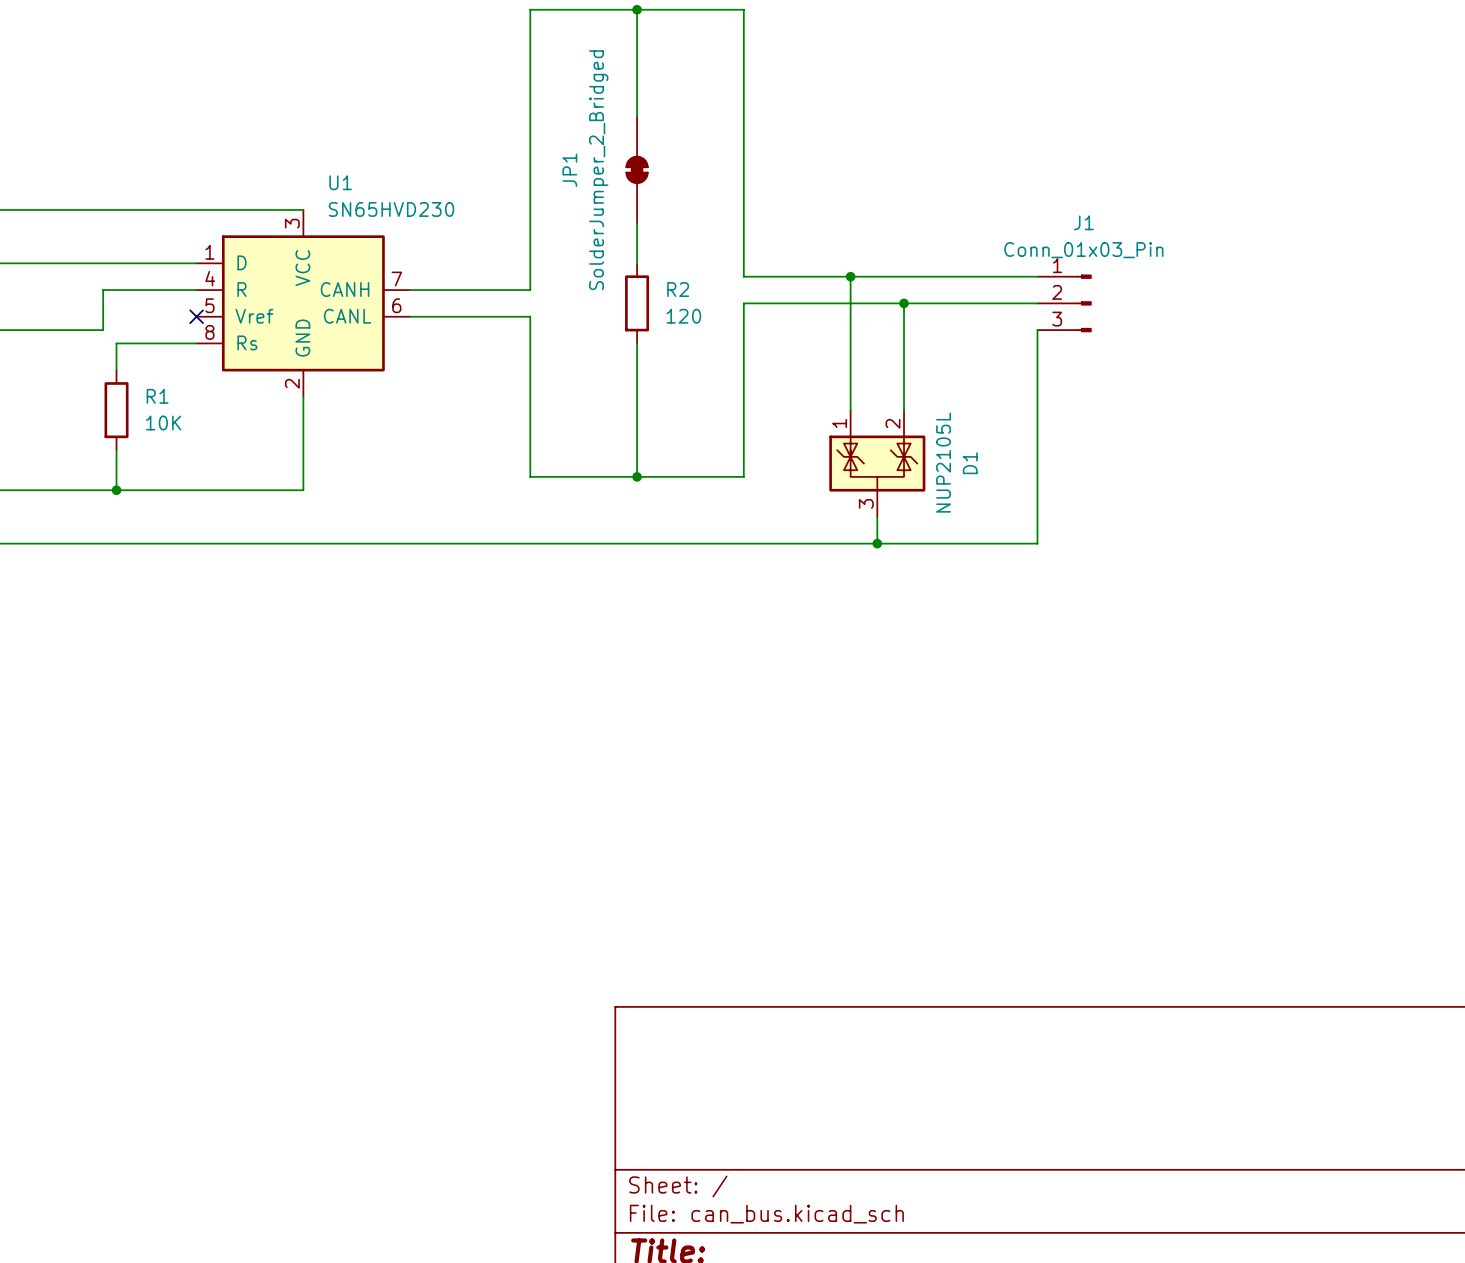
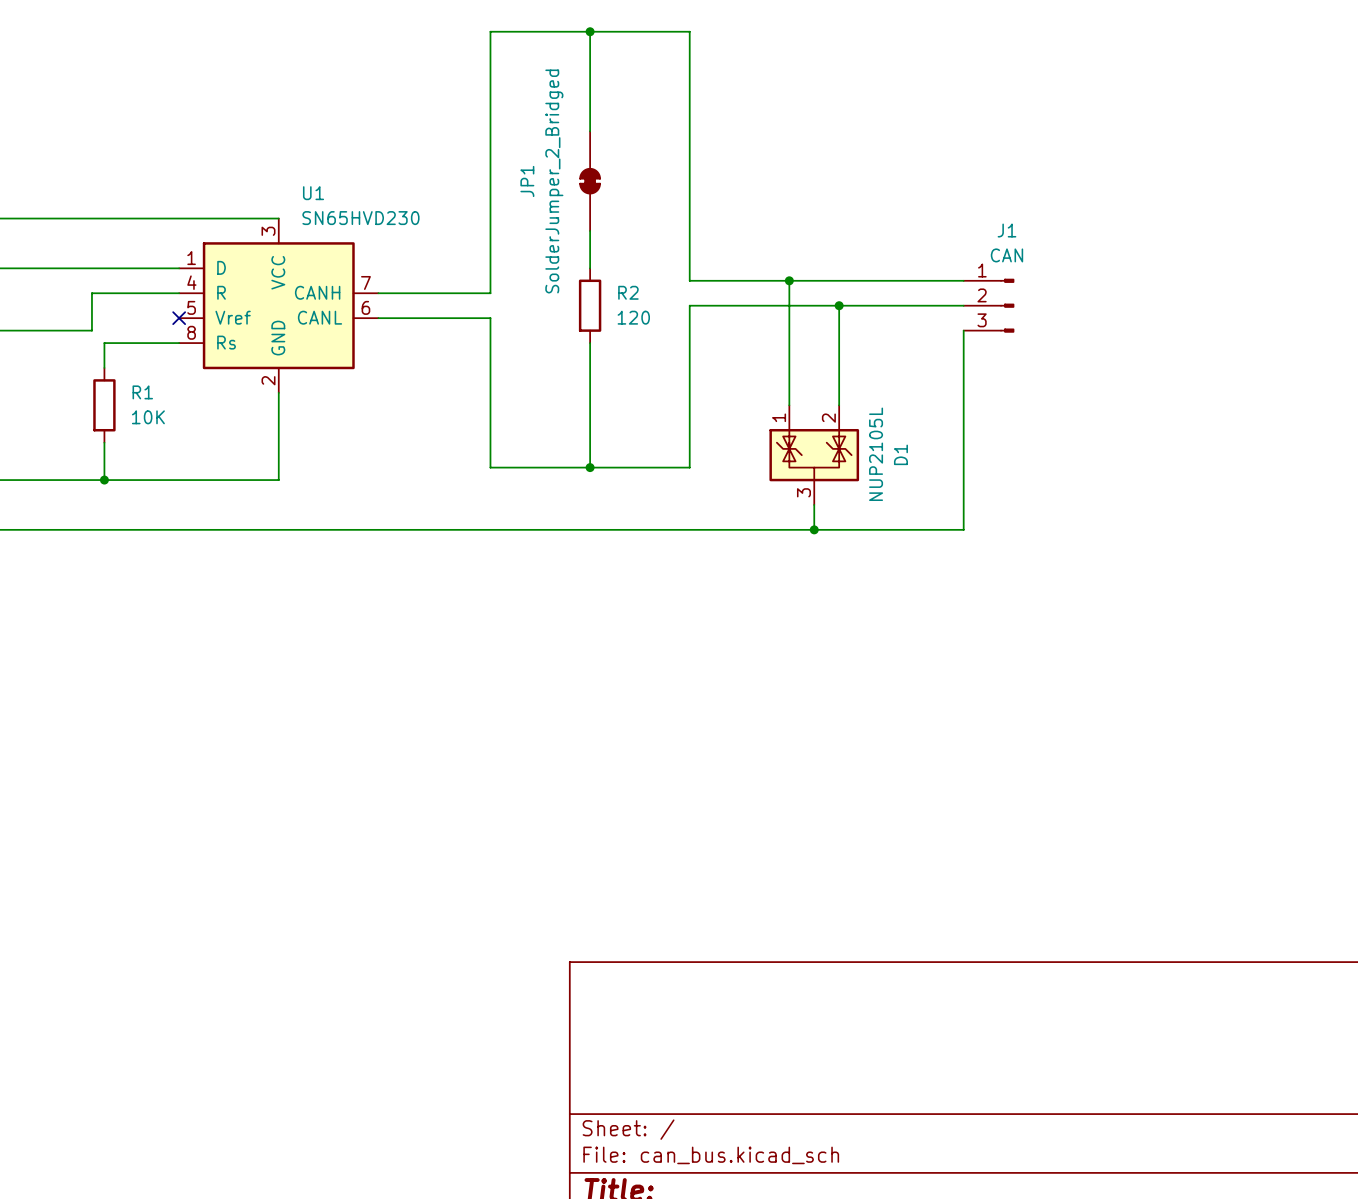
J1 value: Conn_01x03_Pin (1083, 250) -> CAN (1006, 255)

